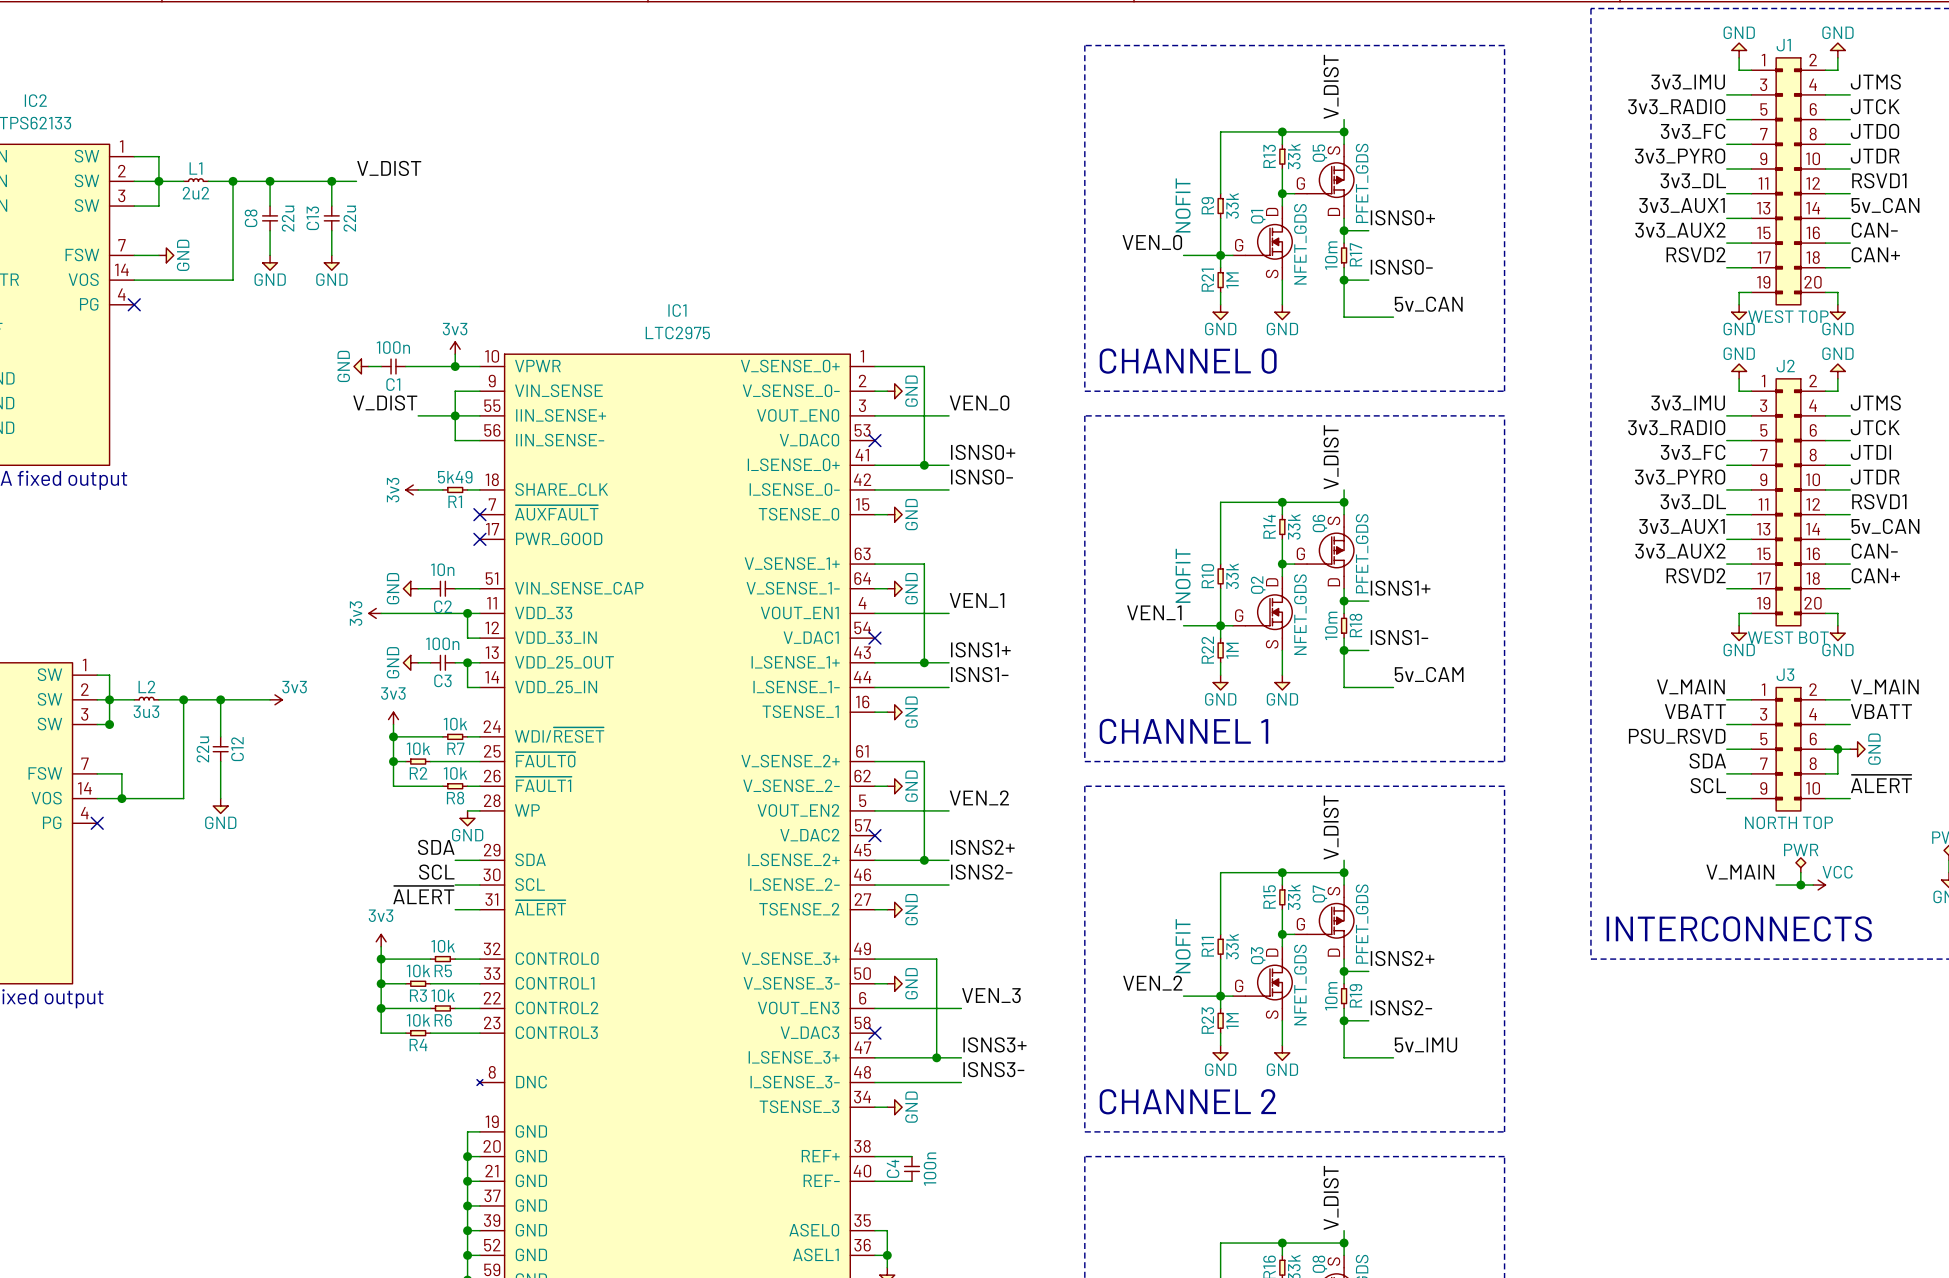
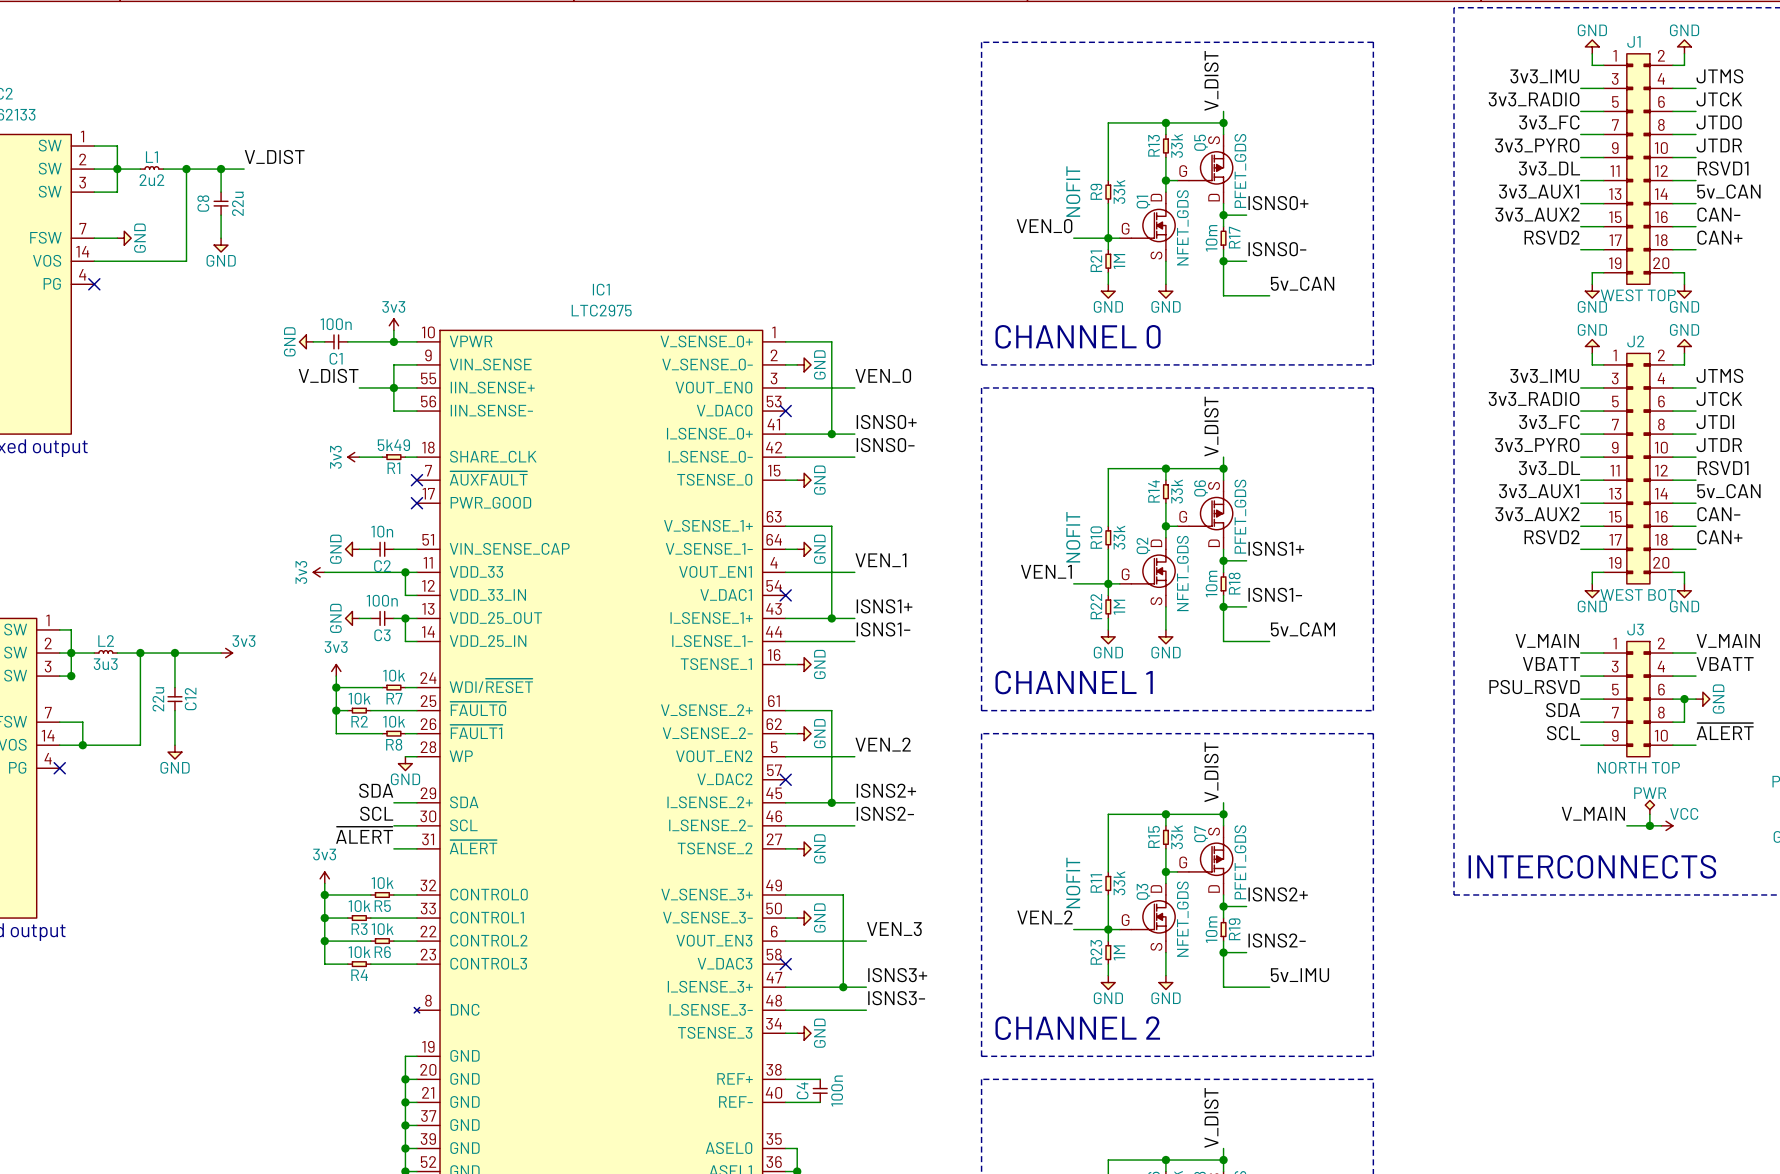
label position: V_DIST (389, 168) -> V_DIST (274, 156)
wire: (294, 181) (356, 181) -> none
wire: (331, 181) (331, 206) -> none
junction: (331, 181) -> none
C13: 22u (331, 218) -> none
wire: (331, 230) (331, 255) -> none
power symbol: GND (331, 262) -> none

